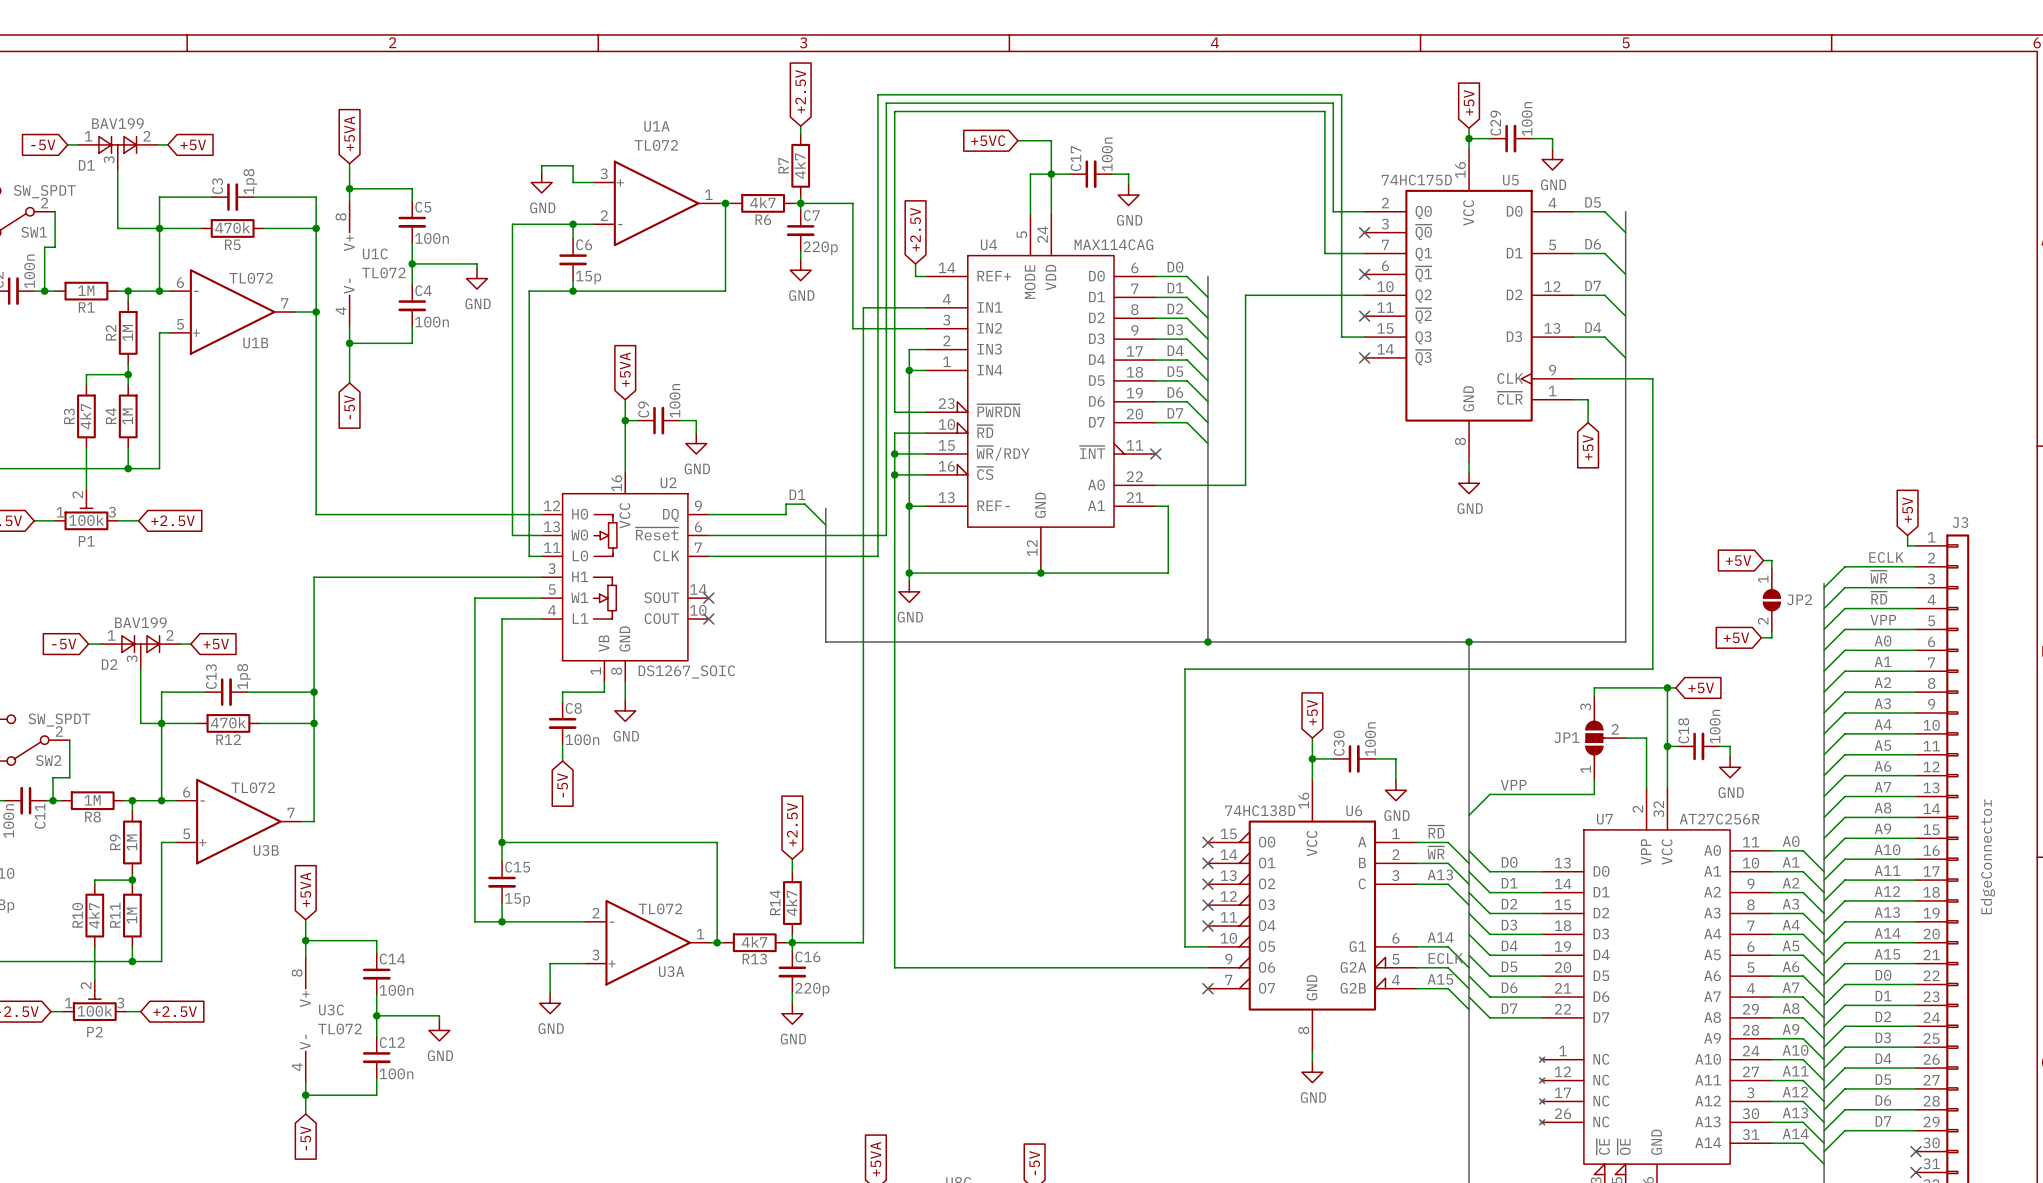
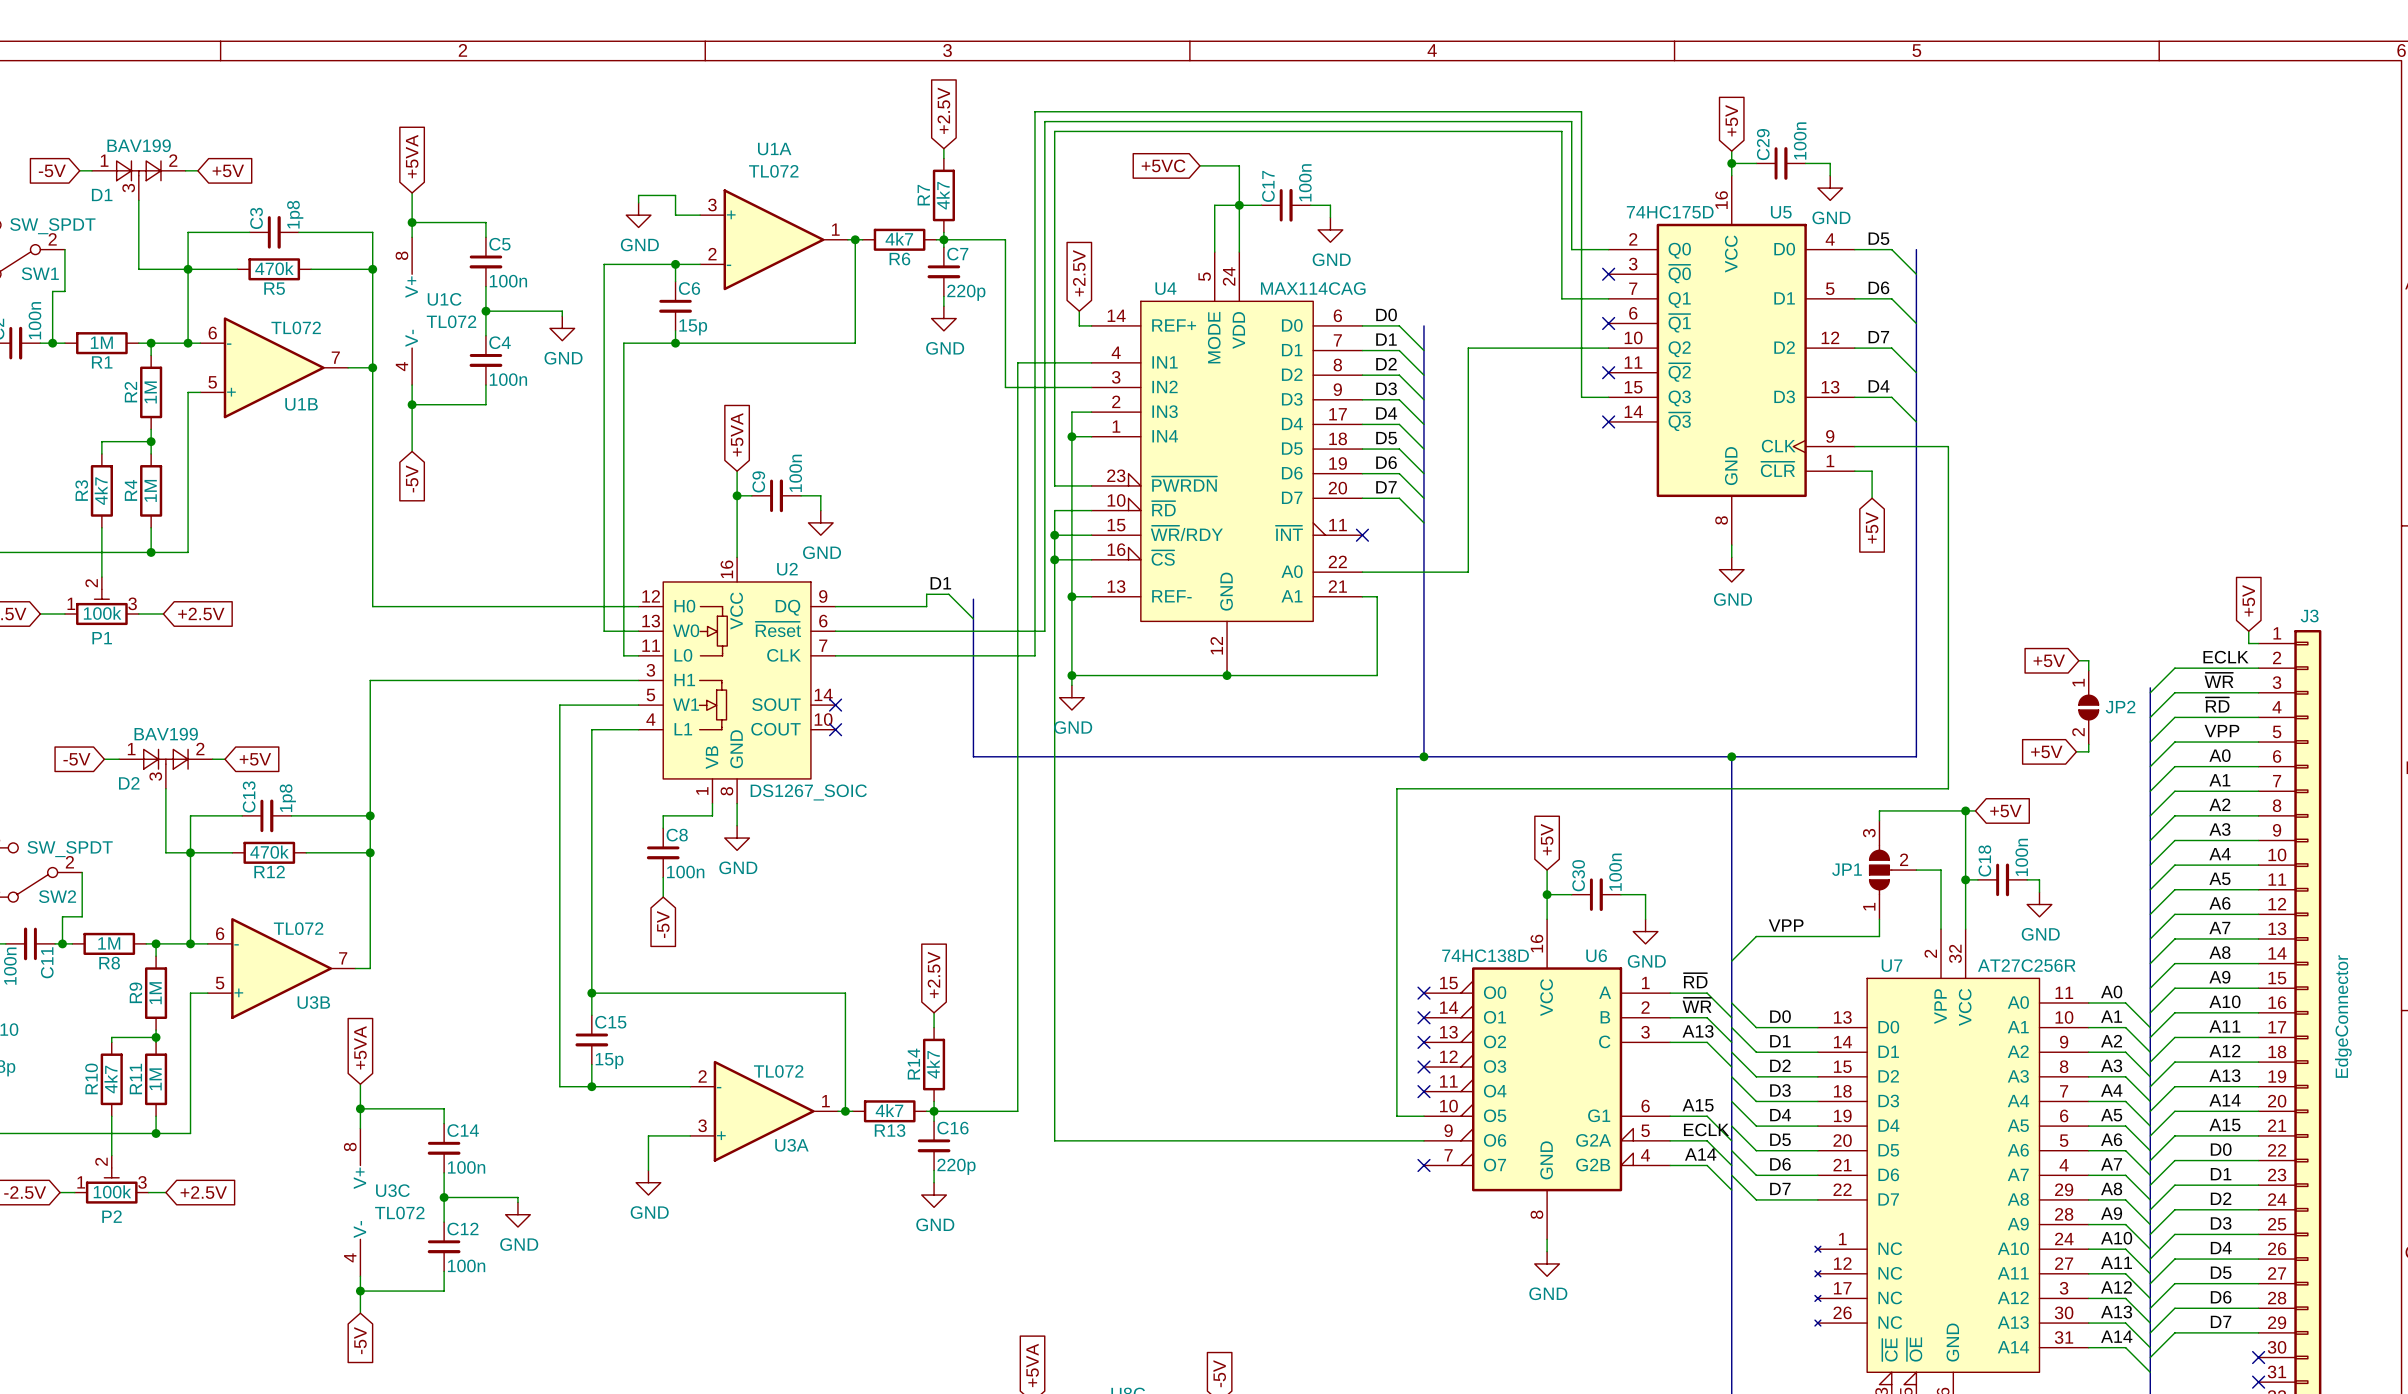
label: A14 (1440, 937) -> A15 (1698, 1105)
label: A15 (1440, 979) -> A14 (1700, 1154)

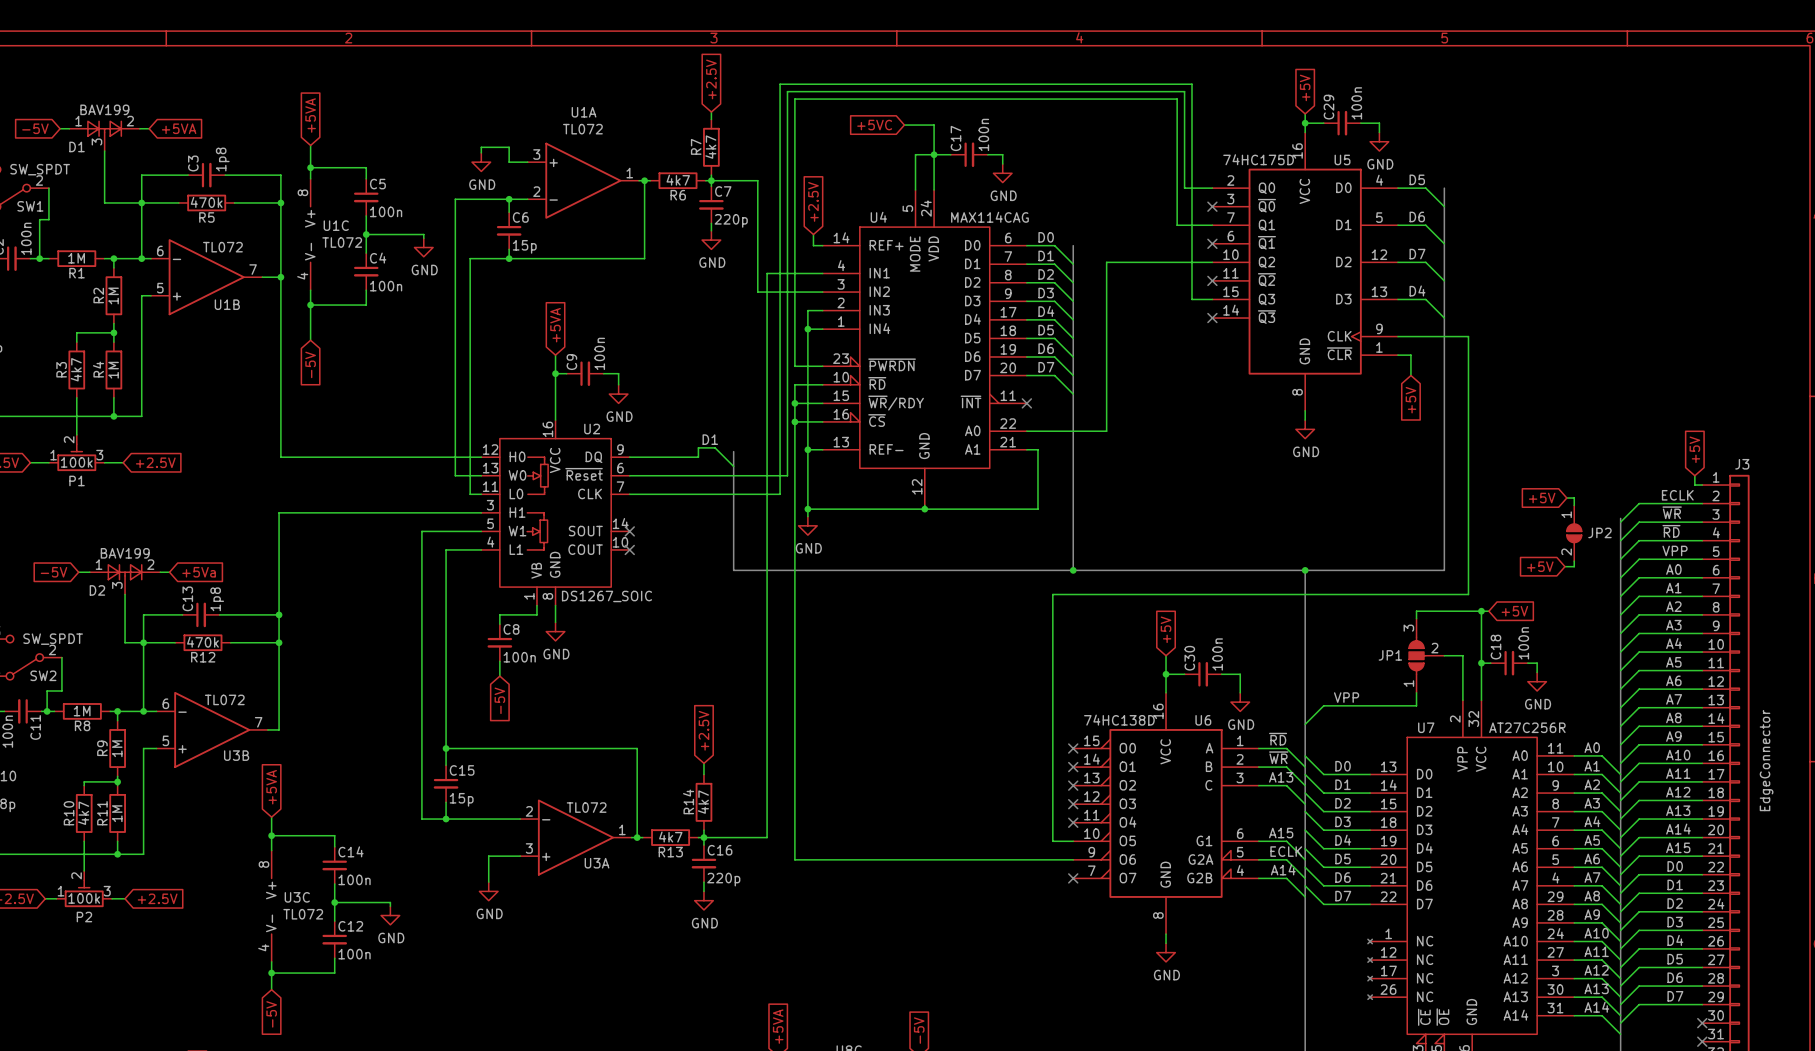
global label: +5V (228, 170) -> +5VA (179, 128)
global label: +5V (255, 759) -> +5Va (199, 572)

